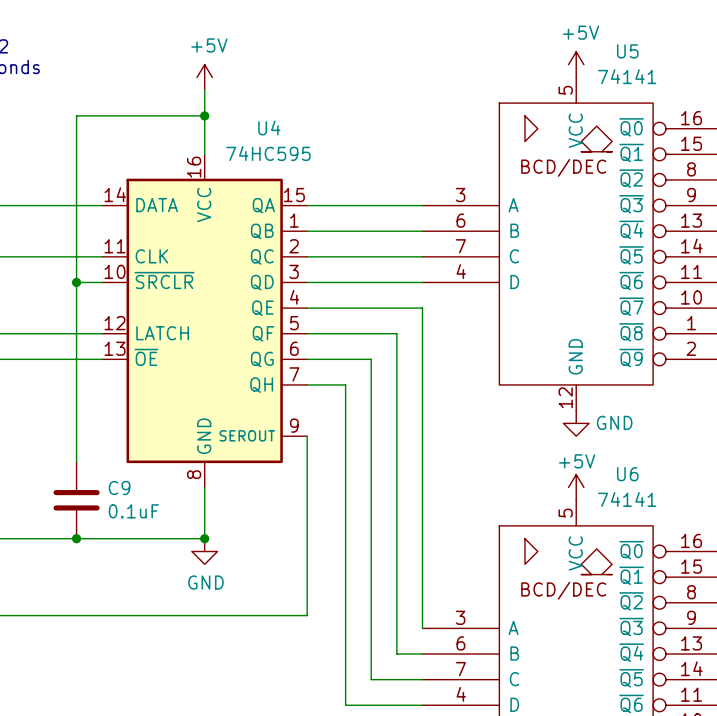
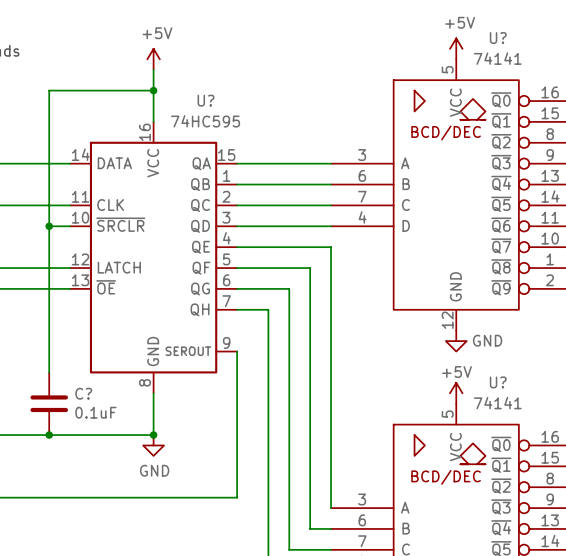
U5 name: U5 (627, 51) -> U? (498, 38)
U4 name: U4 (269, 127) -> U? (206, 100)
U6 name: U6 (627, 474) -> U? (498, 382)
C9 name: C9 (119, 488) -> C? (83, 393)

